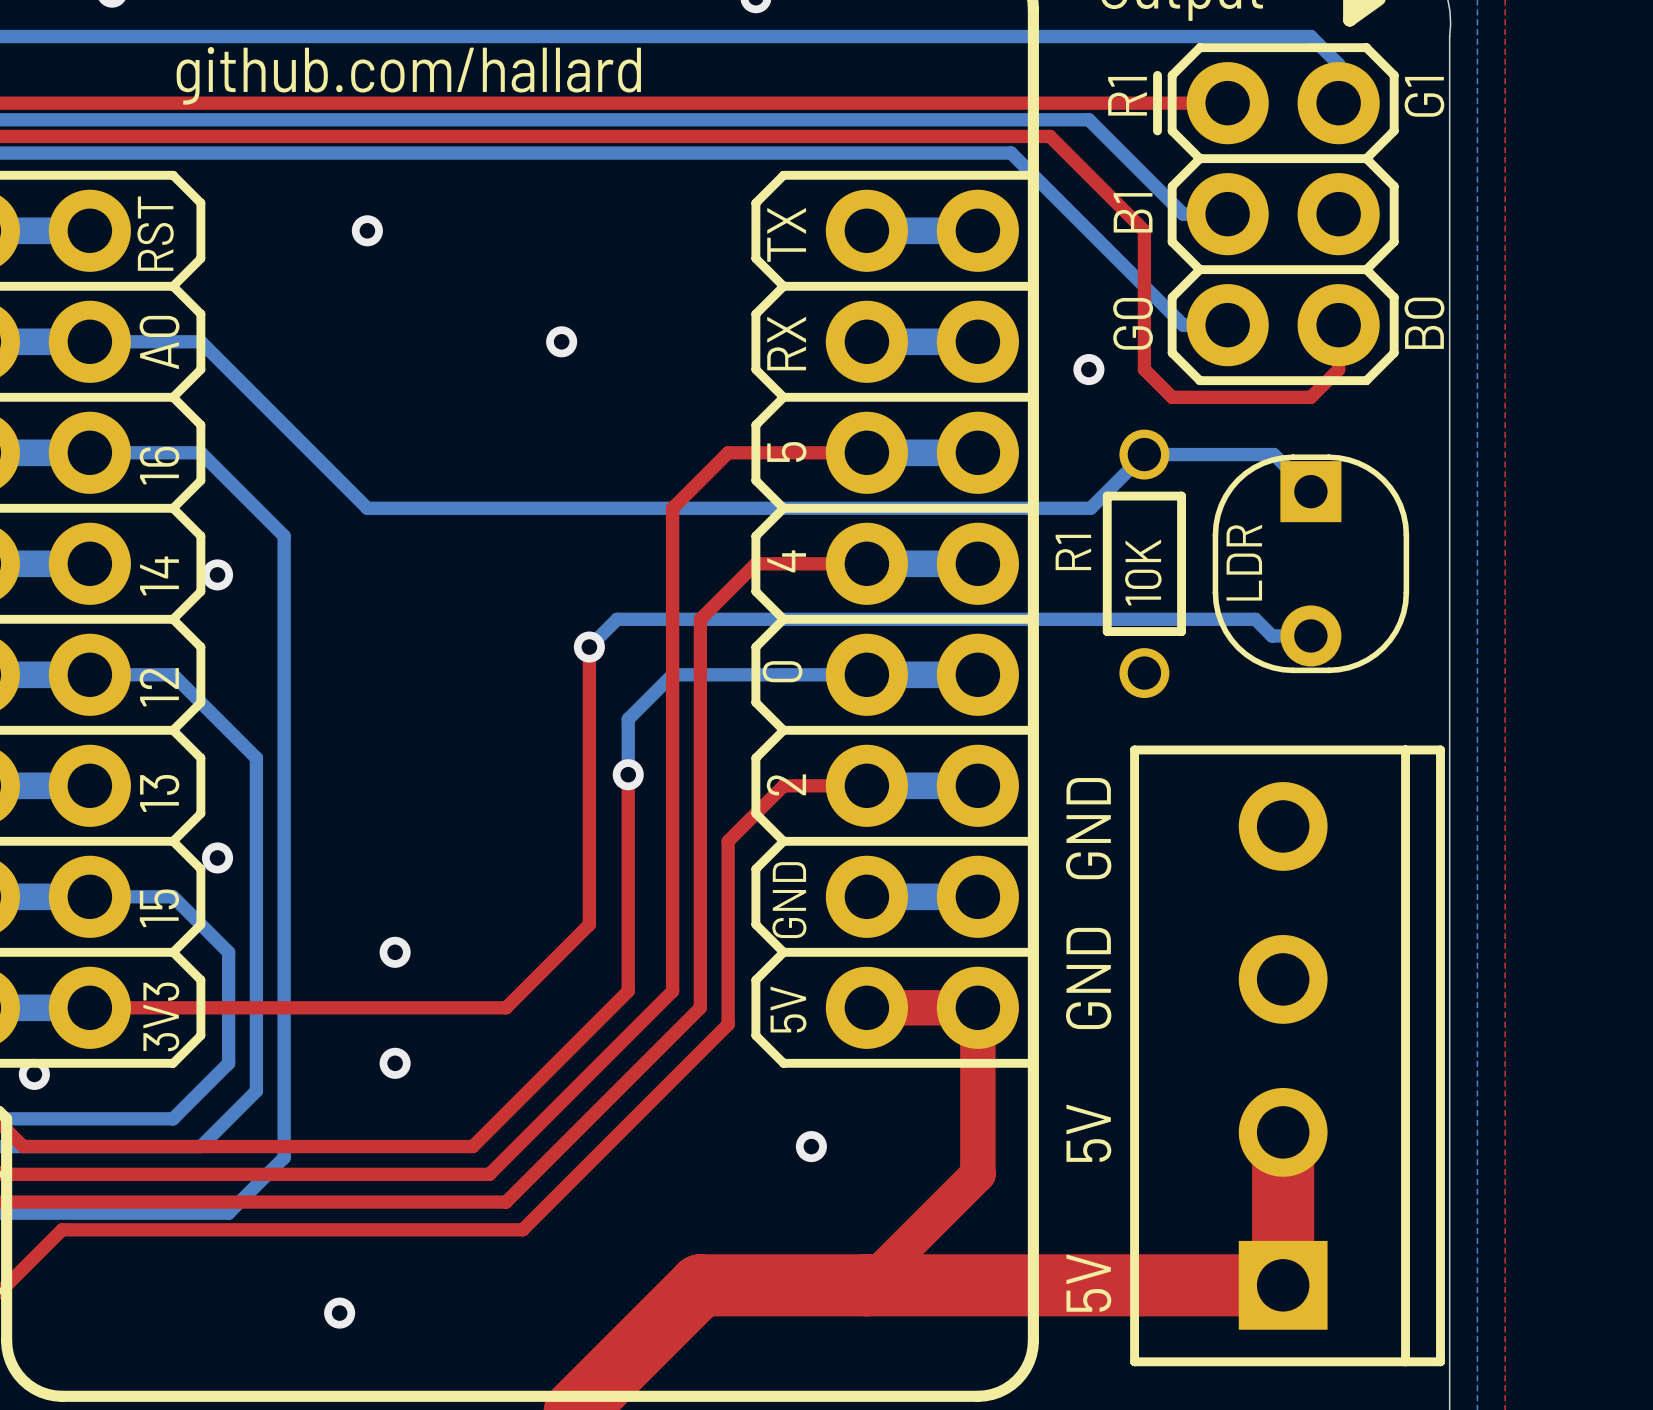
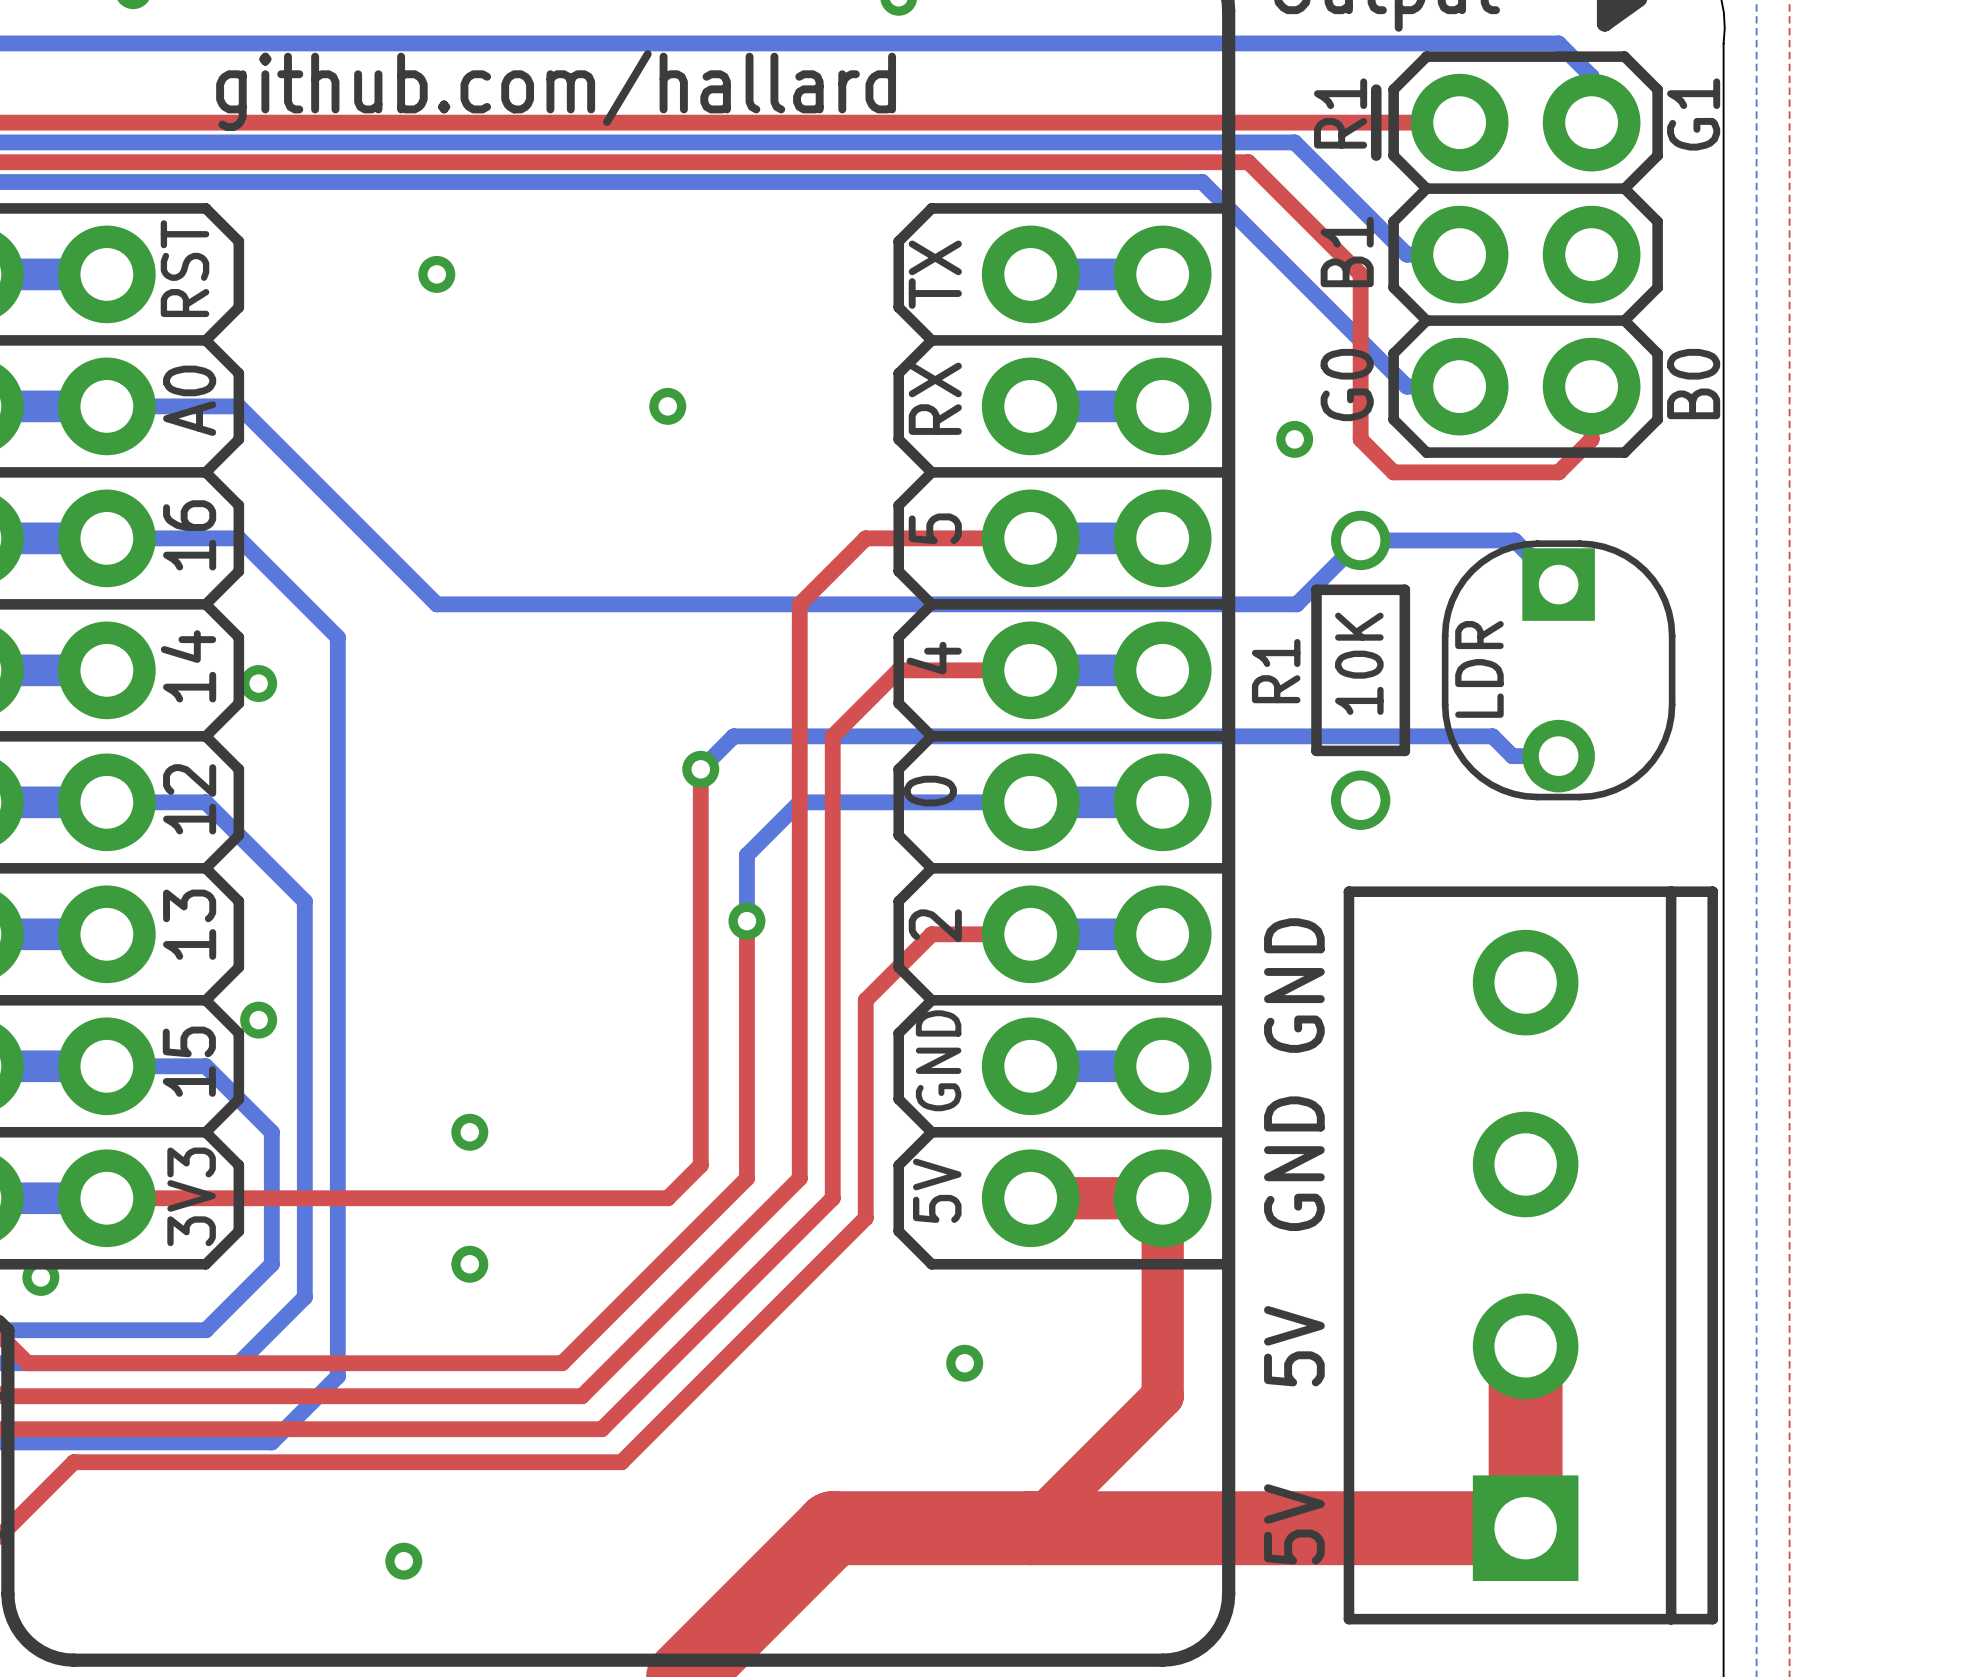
top track: (589, 924) (506, 1007) -> (700, 1099) (700, 1165) (667, 1198) (601, 1198)

